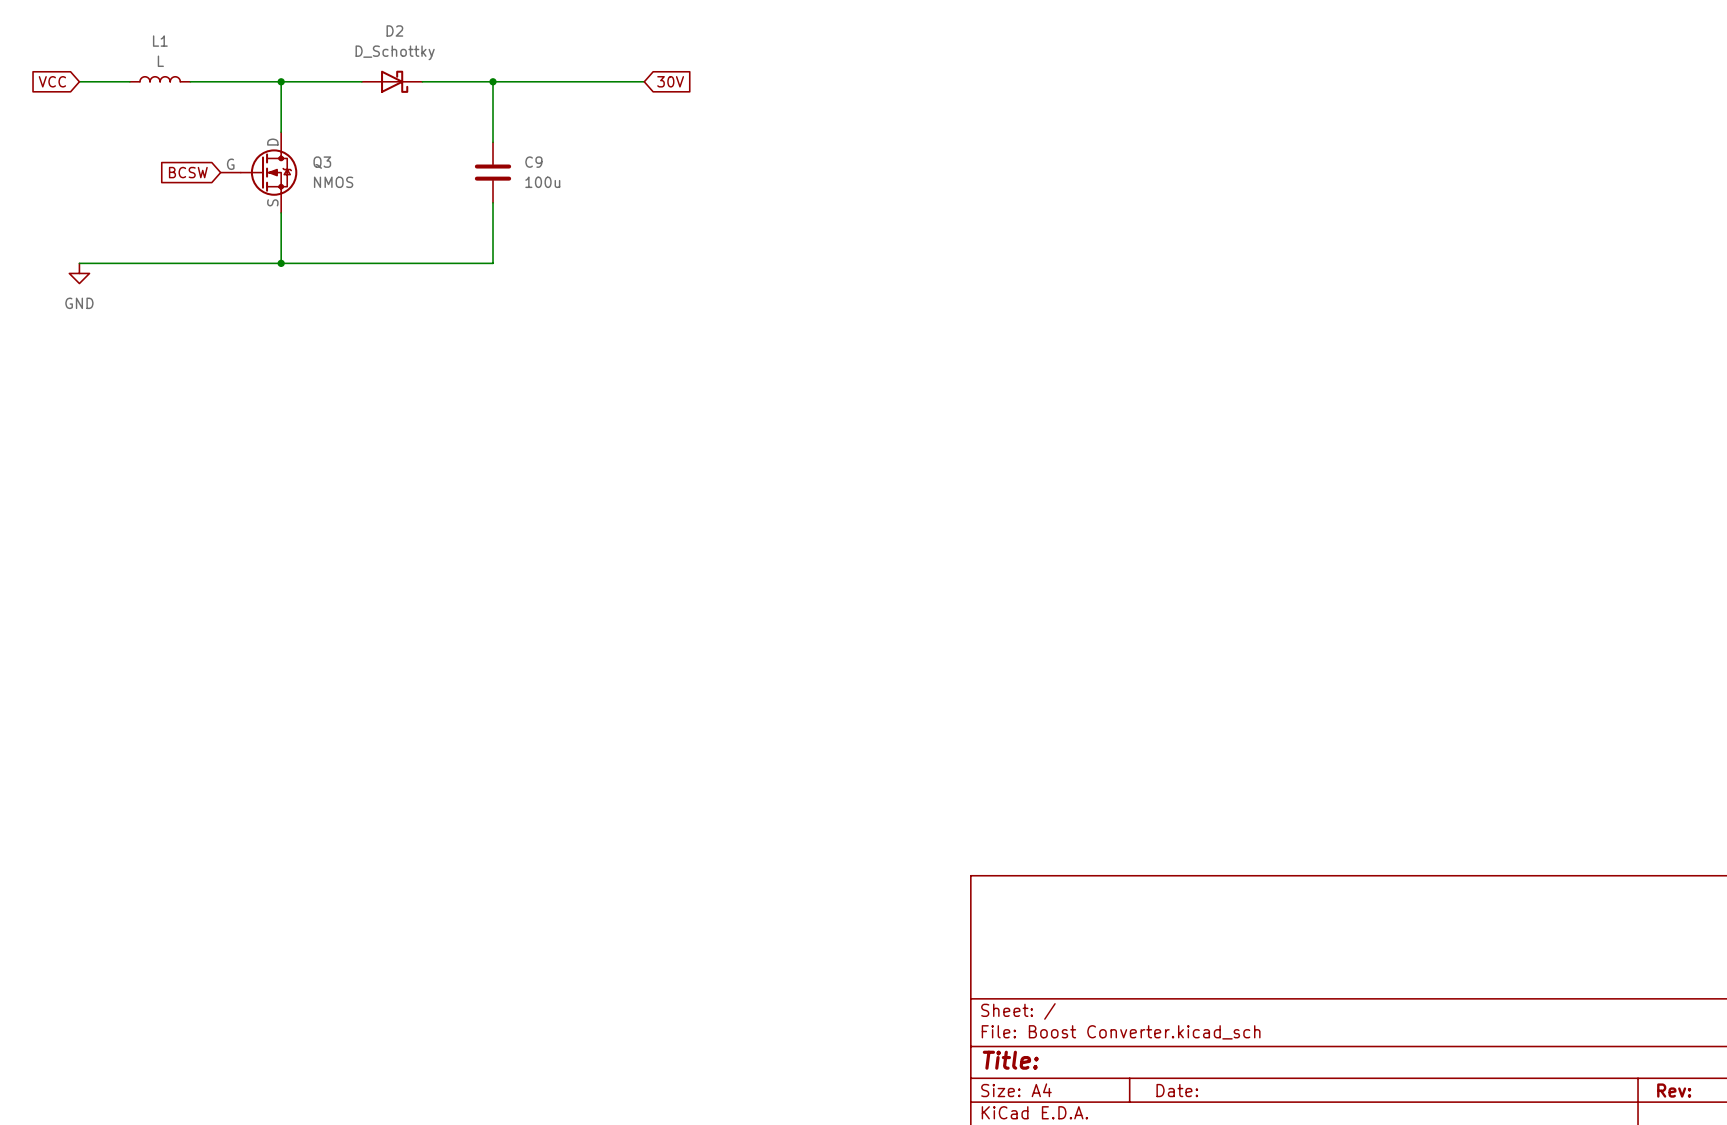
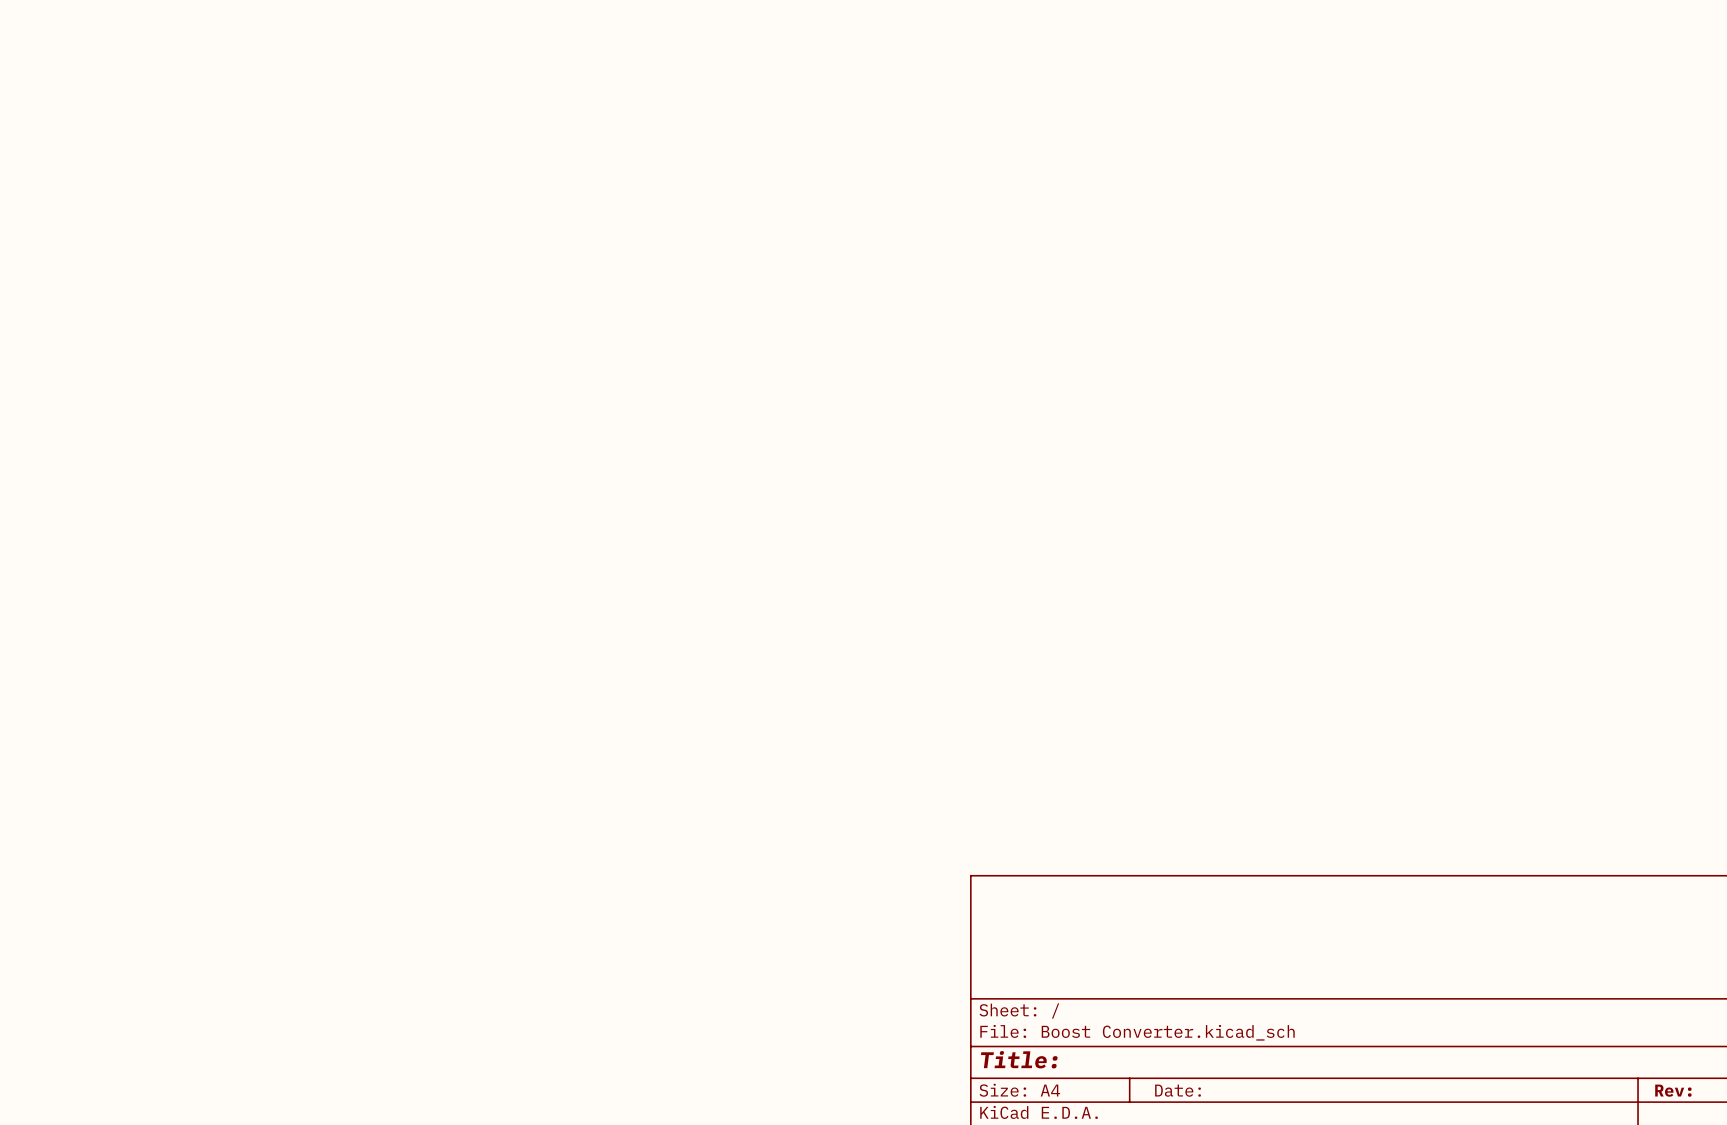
L1: L (160, 79) -> none
global label: VCC (52, 81) -> none
wire: (79, 81) (129, 81) -> none
wire: (190, 81) (361, 81) -> none
wire: (281, 81) (281, 132) -> none
junction: (281, 81) -> none
D2: D_Schottky (392, 81) -> none
wire: (422, 81) (644, 81) -> none
wire: (493, 81) (493, 142) -> none
junction: (493, 81) -> none
global label: 30V (670, 81) -> none
global label: BCSW (188, 172) -> none
Q3: NMOS (258, 172) -> none
C9: 100u (493, 172) -> none
wire: (493, 202) (493, 263) (79, 263) -> none
wire: (281, 212) (281, 263) -> none
junction: (281, 263) -> none
power symbol: GND (79, 273) -> none

